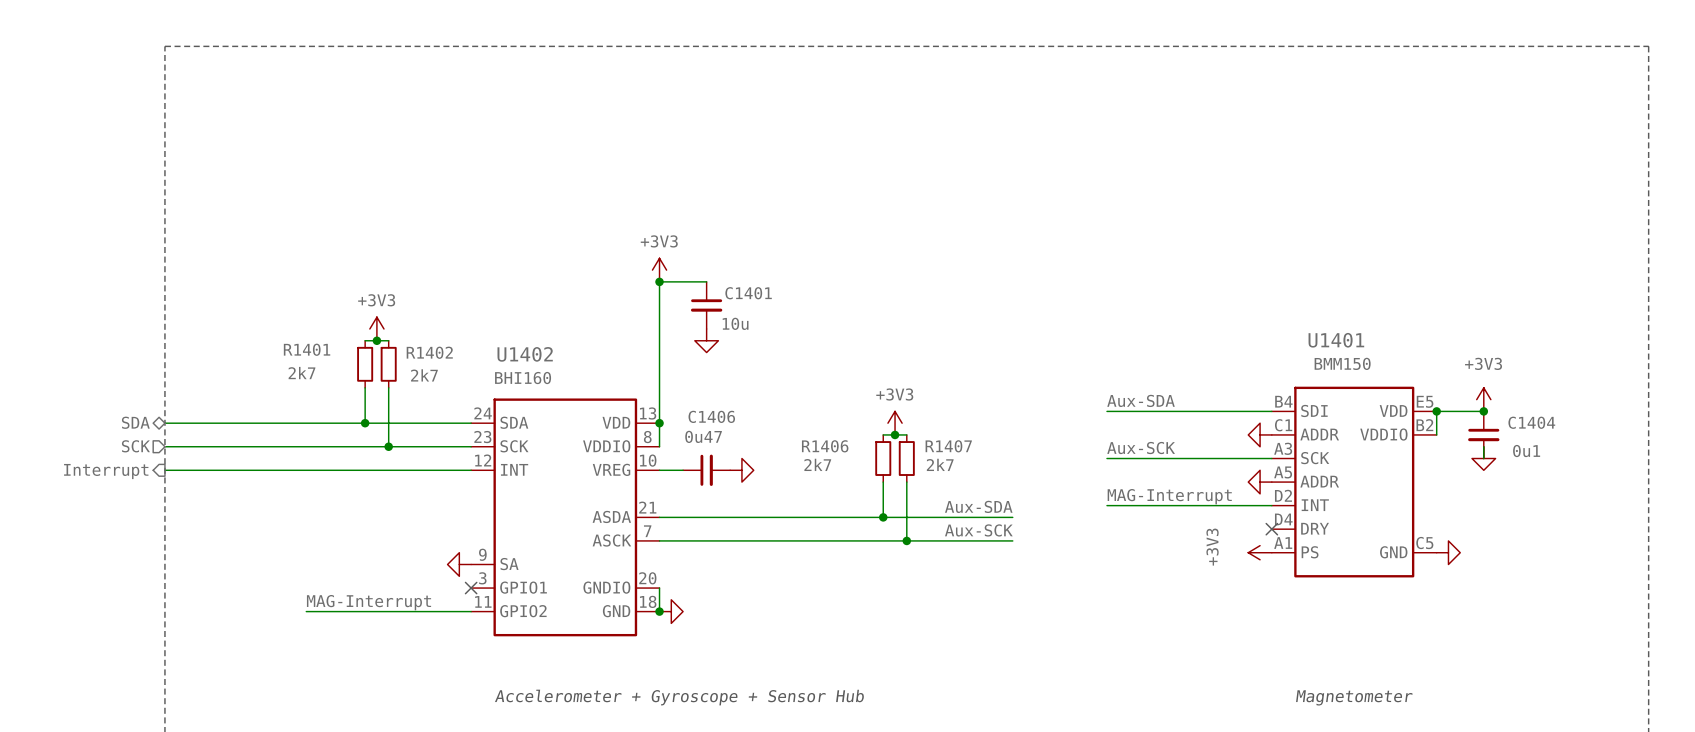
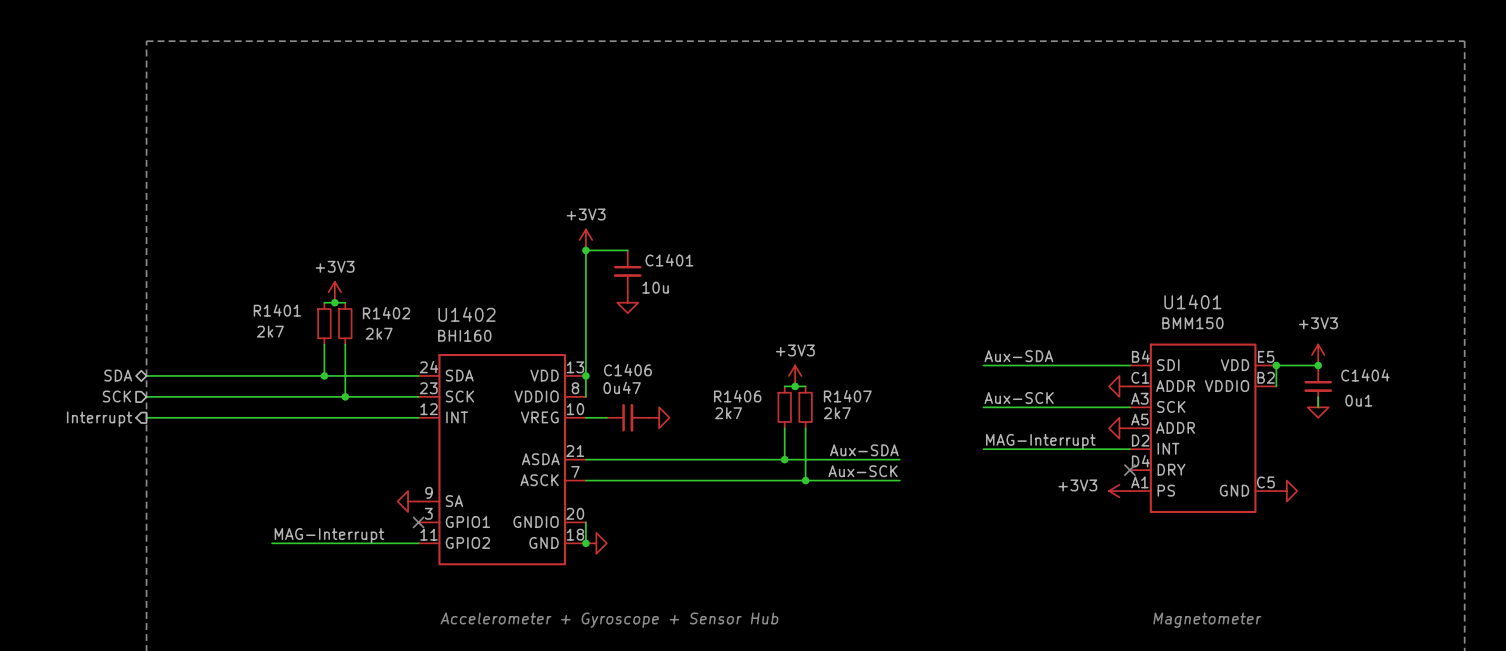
power symbol text rotation: 0° (1212, 547) -> 90° clockwise (1077, 485)

